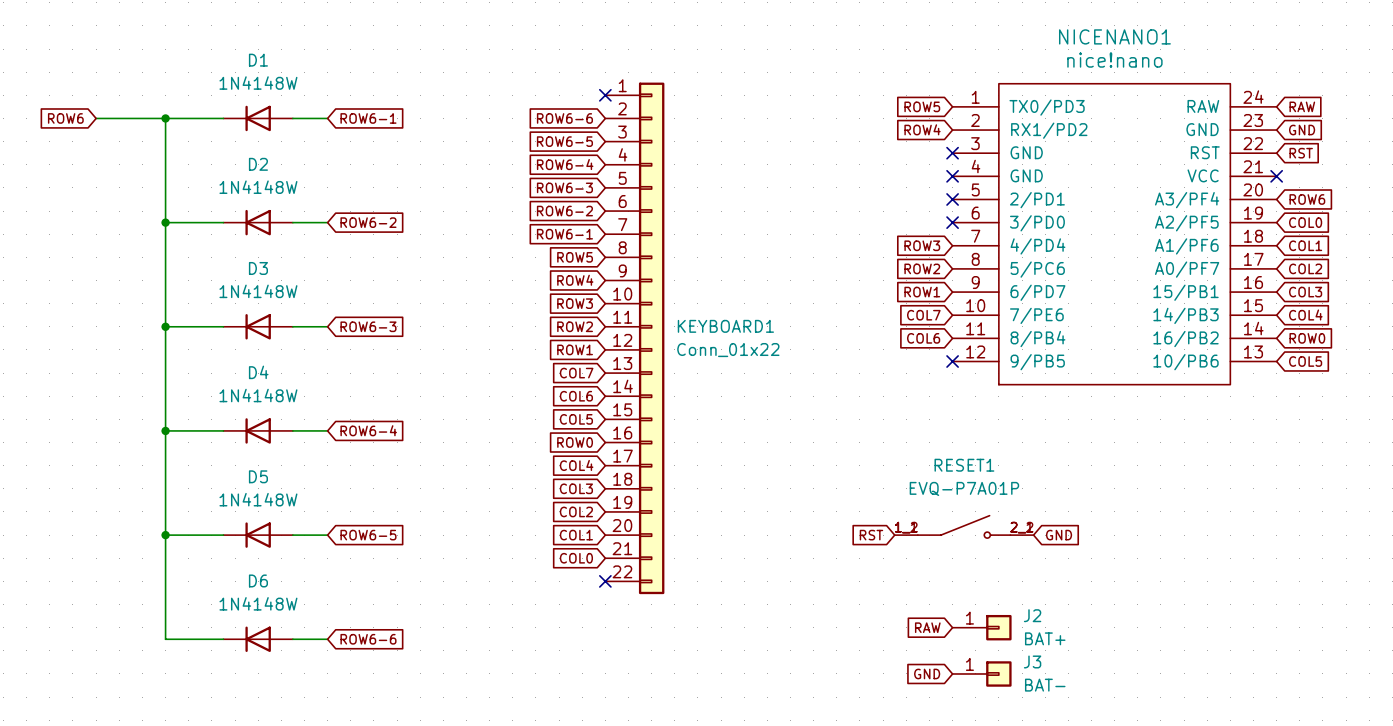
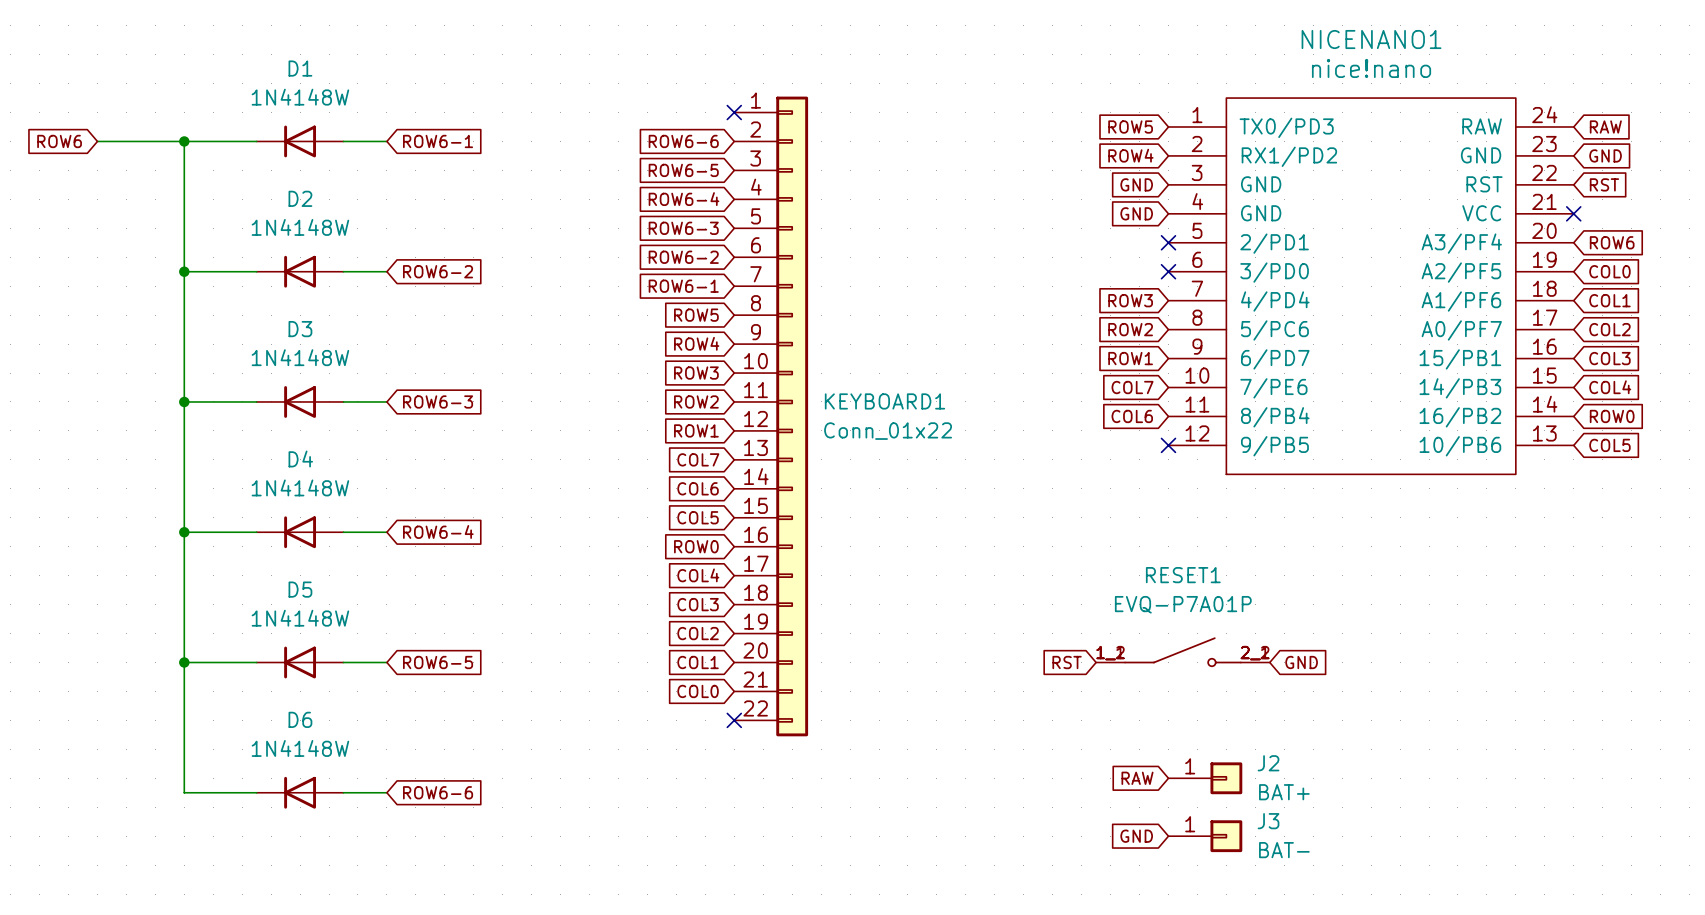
global label: none -> GND (1136, 184)
no-connect mark: (952, 153) -> none
global label: none -> GND (1136, 213)
no-connect mark: (952, 176) -> none

